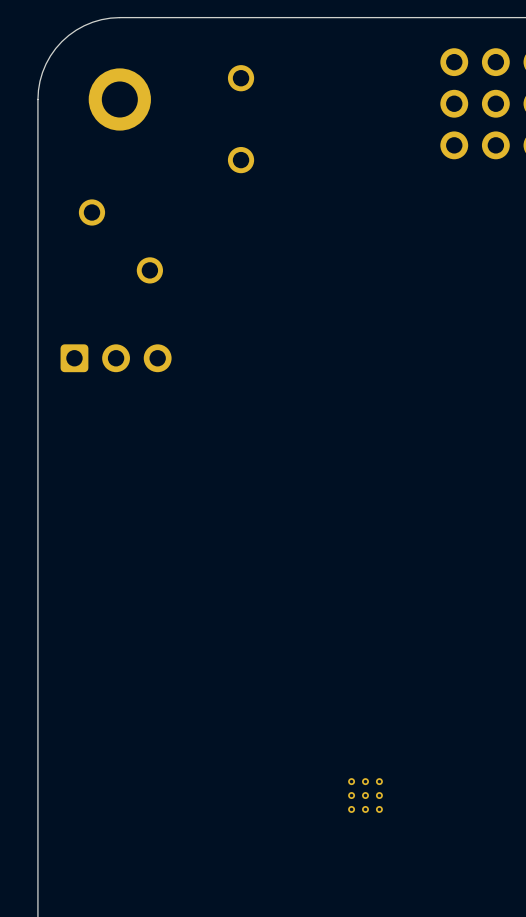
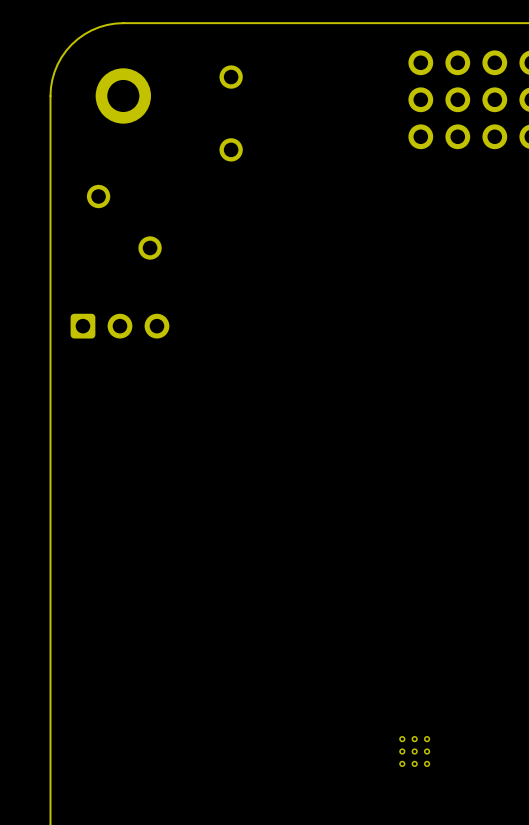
part position: (365, 795) -> (414, 751)

